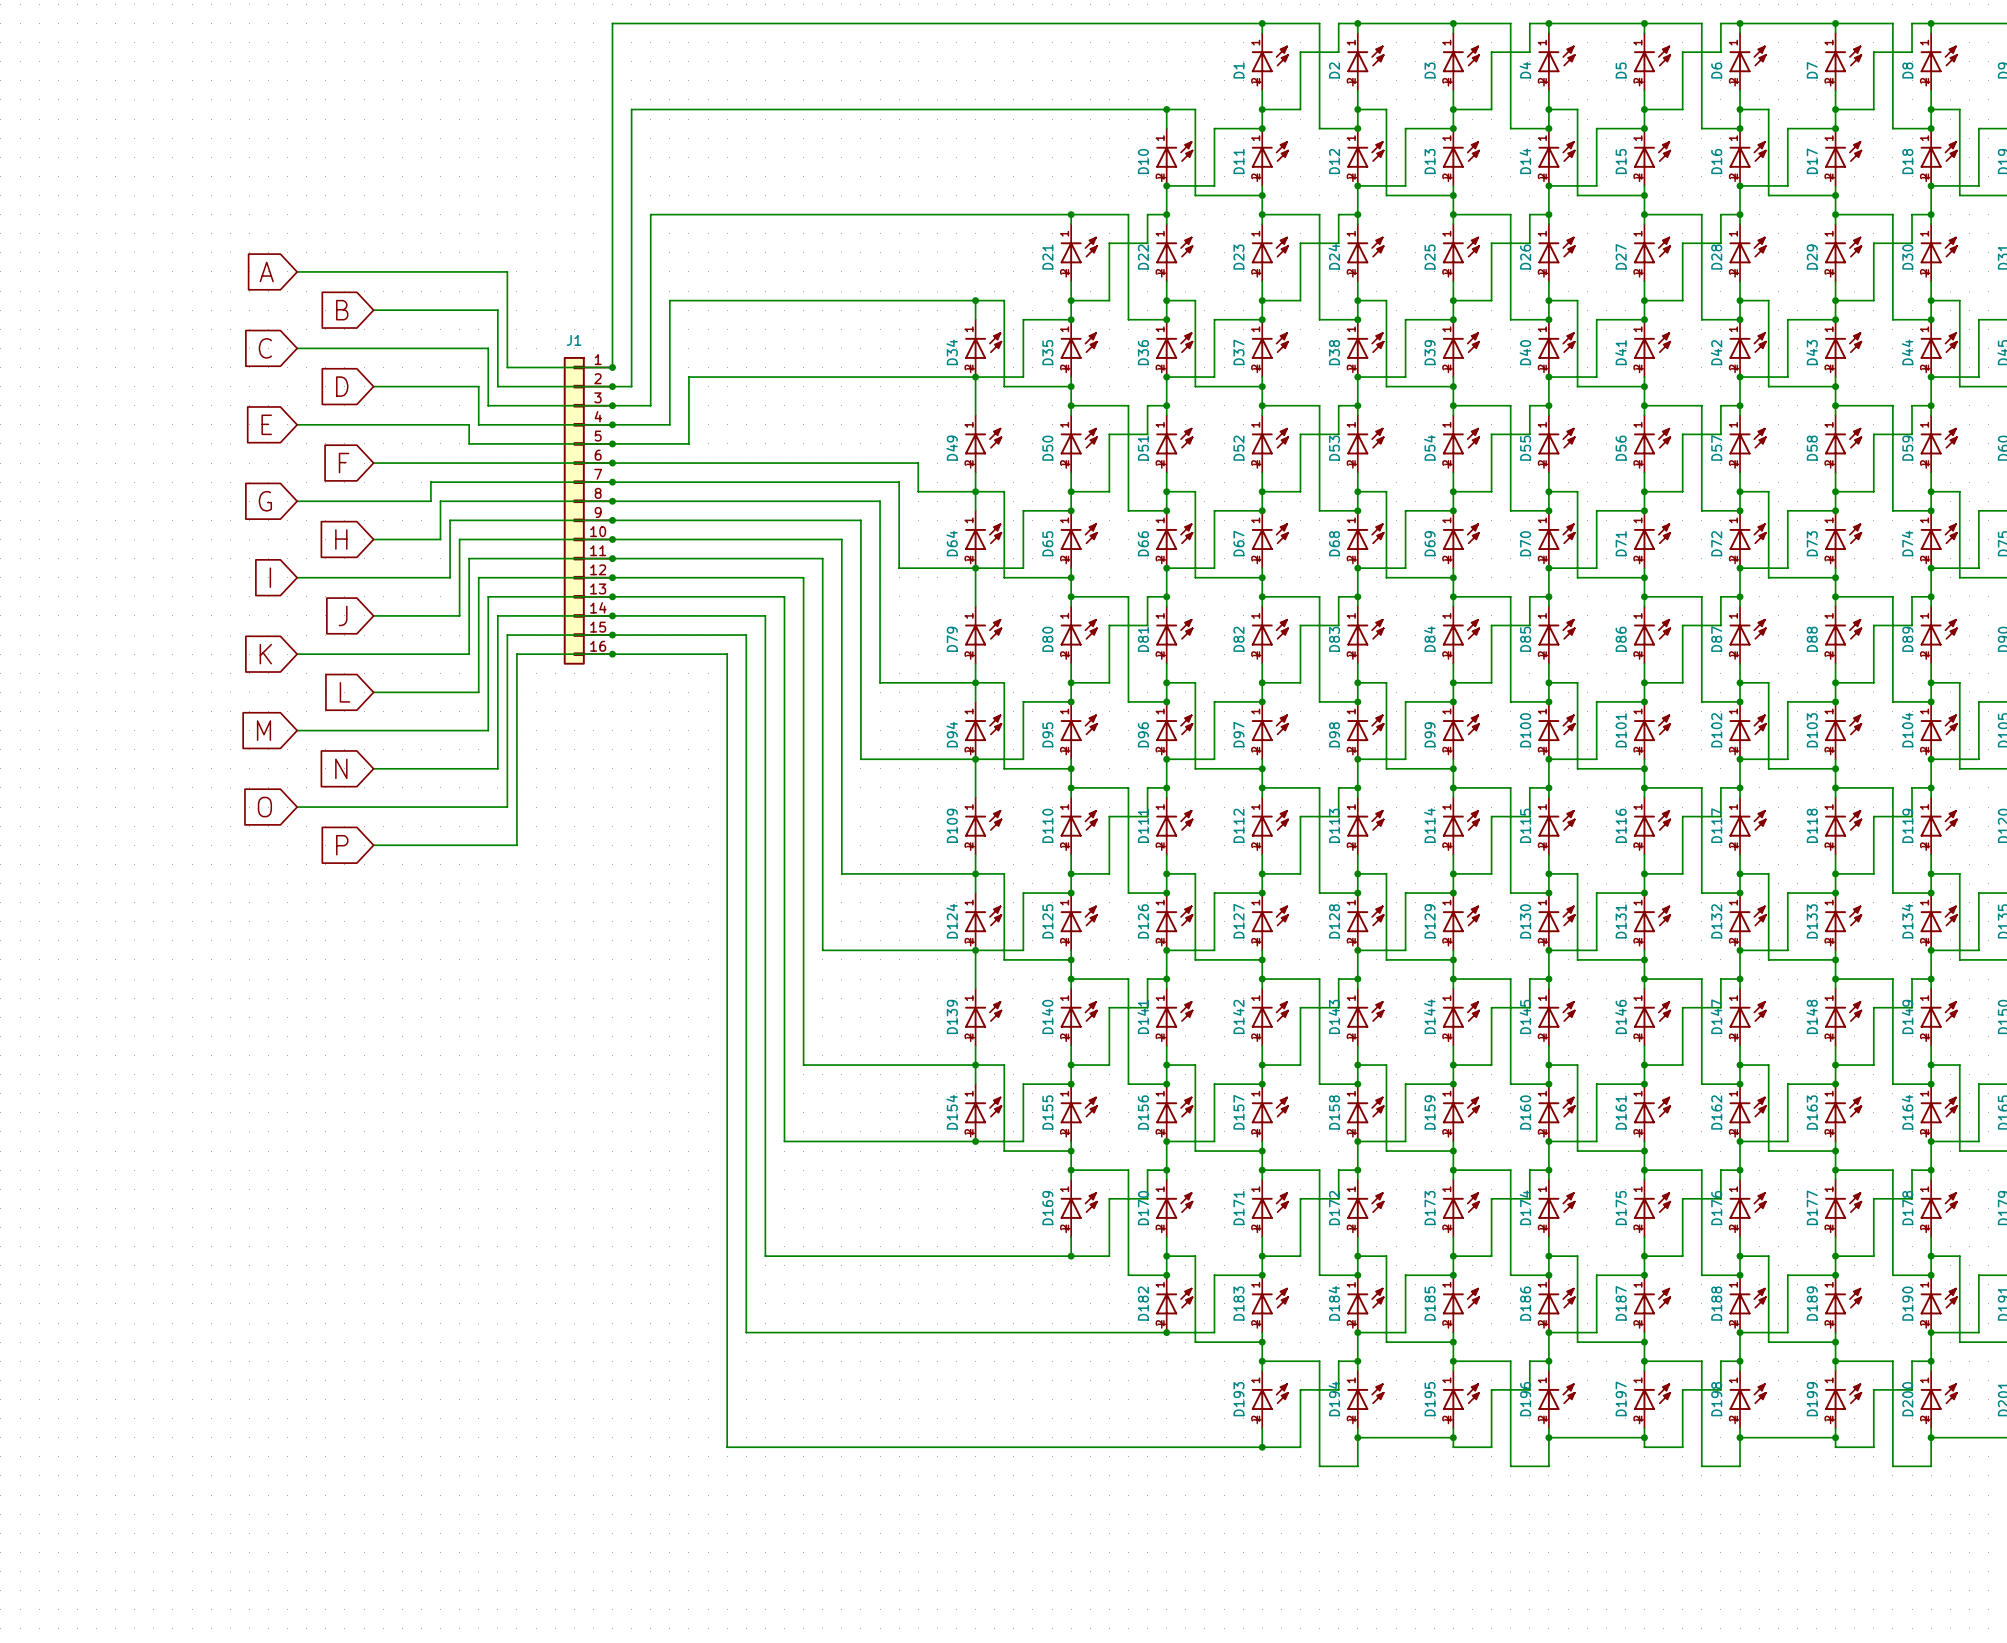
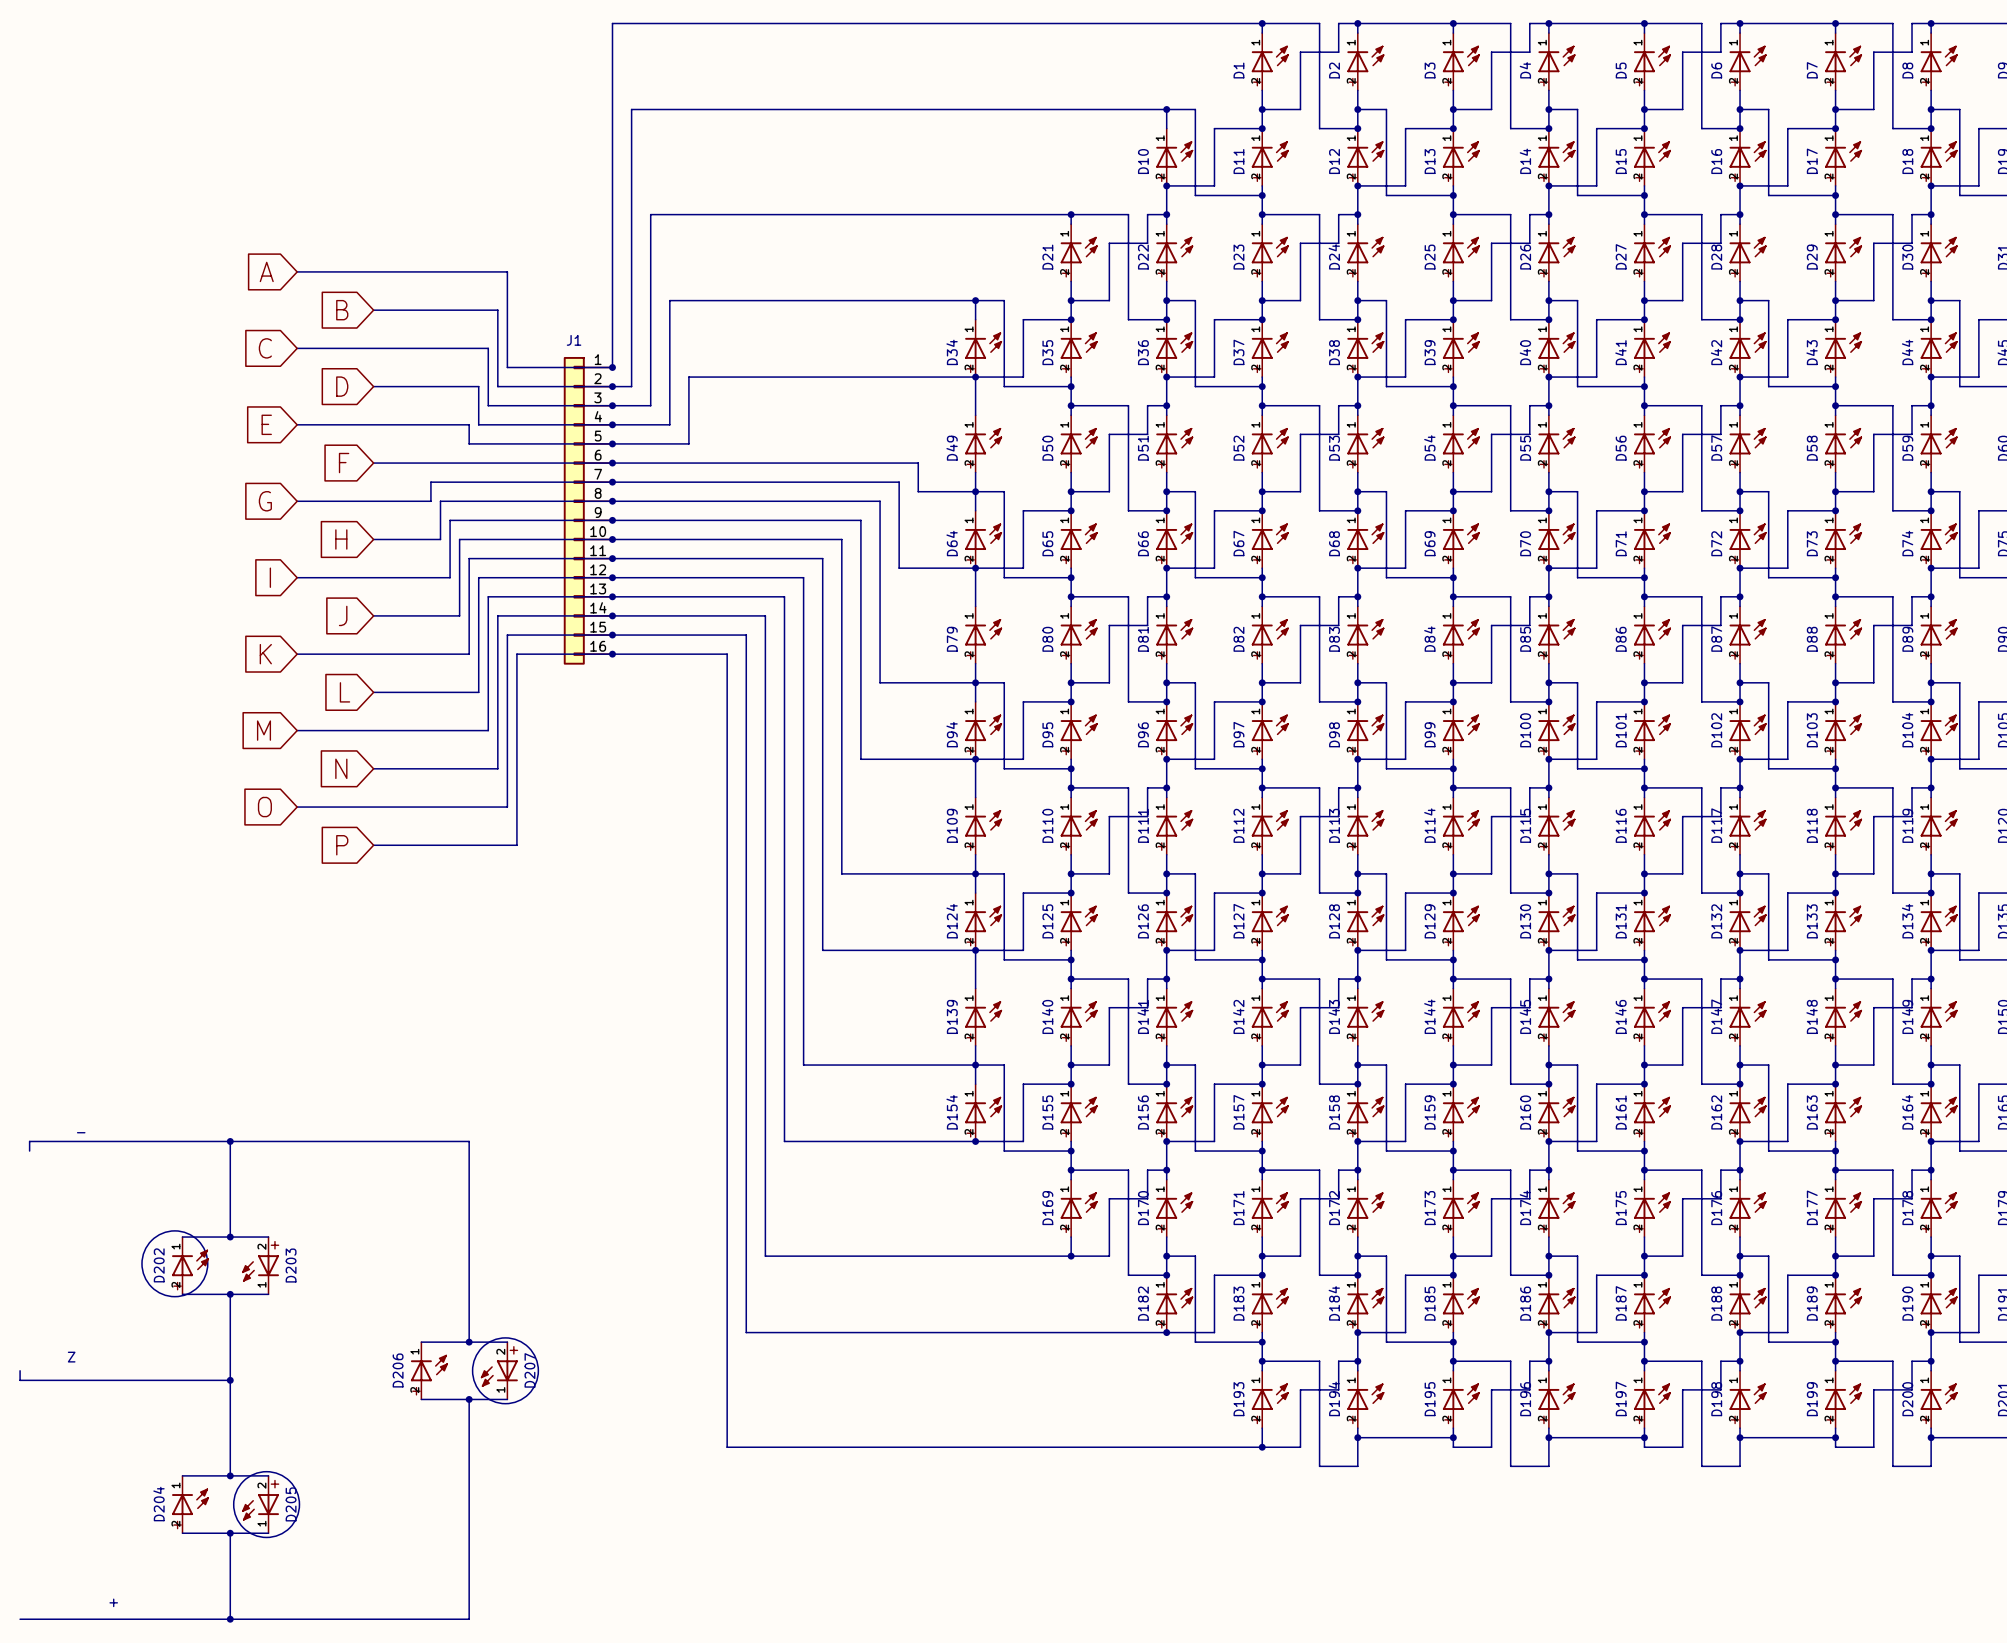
text: none -> - (81, 1132)
wire: none -> (230, 1141) (230, 1237)
junction: none -> (230, 1141)
wire: none -> (29, 1151) (29, 1141) (469, 1141) (469, 1342)
drawing: none -> [141, 1230, 208, 1297]
wire: none -> (182, 1237) (268, 1237)
junction: none -> (230, 1237)
D202: none -> (190, 1265)
D203: none -> (260, 1265)
wire: none -> (182, 1294) (268, 1294)
wire: none -> (230, 1294) (230, 1475)
junction: none -> (230, 1294)
drawing: none -> [472, 1337, 539, 1404]
wire: none -> (421, 1342) (507, 1342)
junction: none -> (469, 1342)
text: none -> Z (71, 1357)
wire: none -> (20, 1370) (20, 1380) (230, 1380)
D206: none -> (429, 1370)
D207: none -> (499, 1370)
junction: none -> (230, 1380)
wire: none -> (421, 1399) (507, 1399)
wire: none -> (469, 1399) (469, 1619) (20, 1619)
junction: none -> (469, 1399)
drawing: none -> [233, 1471, 300, 1538]
wire: none -> (182, 1475) (268, 1475)
junction: none -> (230, 1475)
D204: none -> (190, 1504)
D205: none -> (260, 1504)
wire: none -> (182, 1533) (268, 1533)
wire: none -> (230, 1533) (230, 1619)
junction: none -> (230, 1533)
text: none -> + (113, 1602)
junction: none -> (230, 1619)

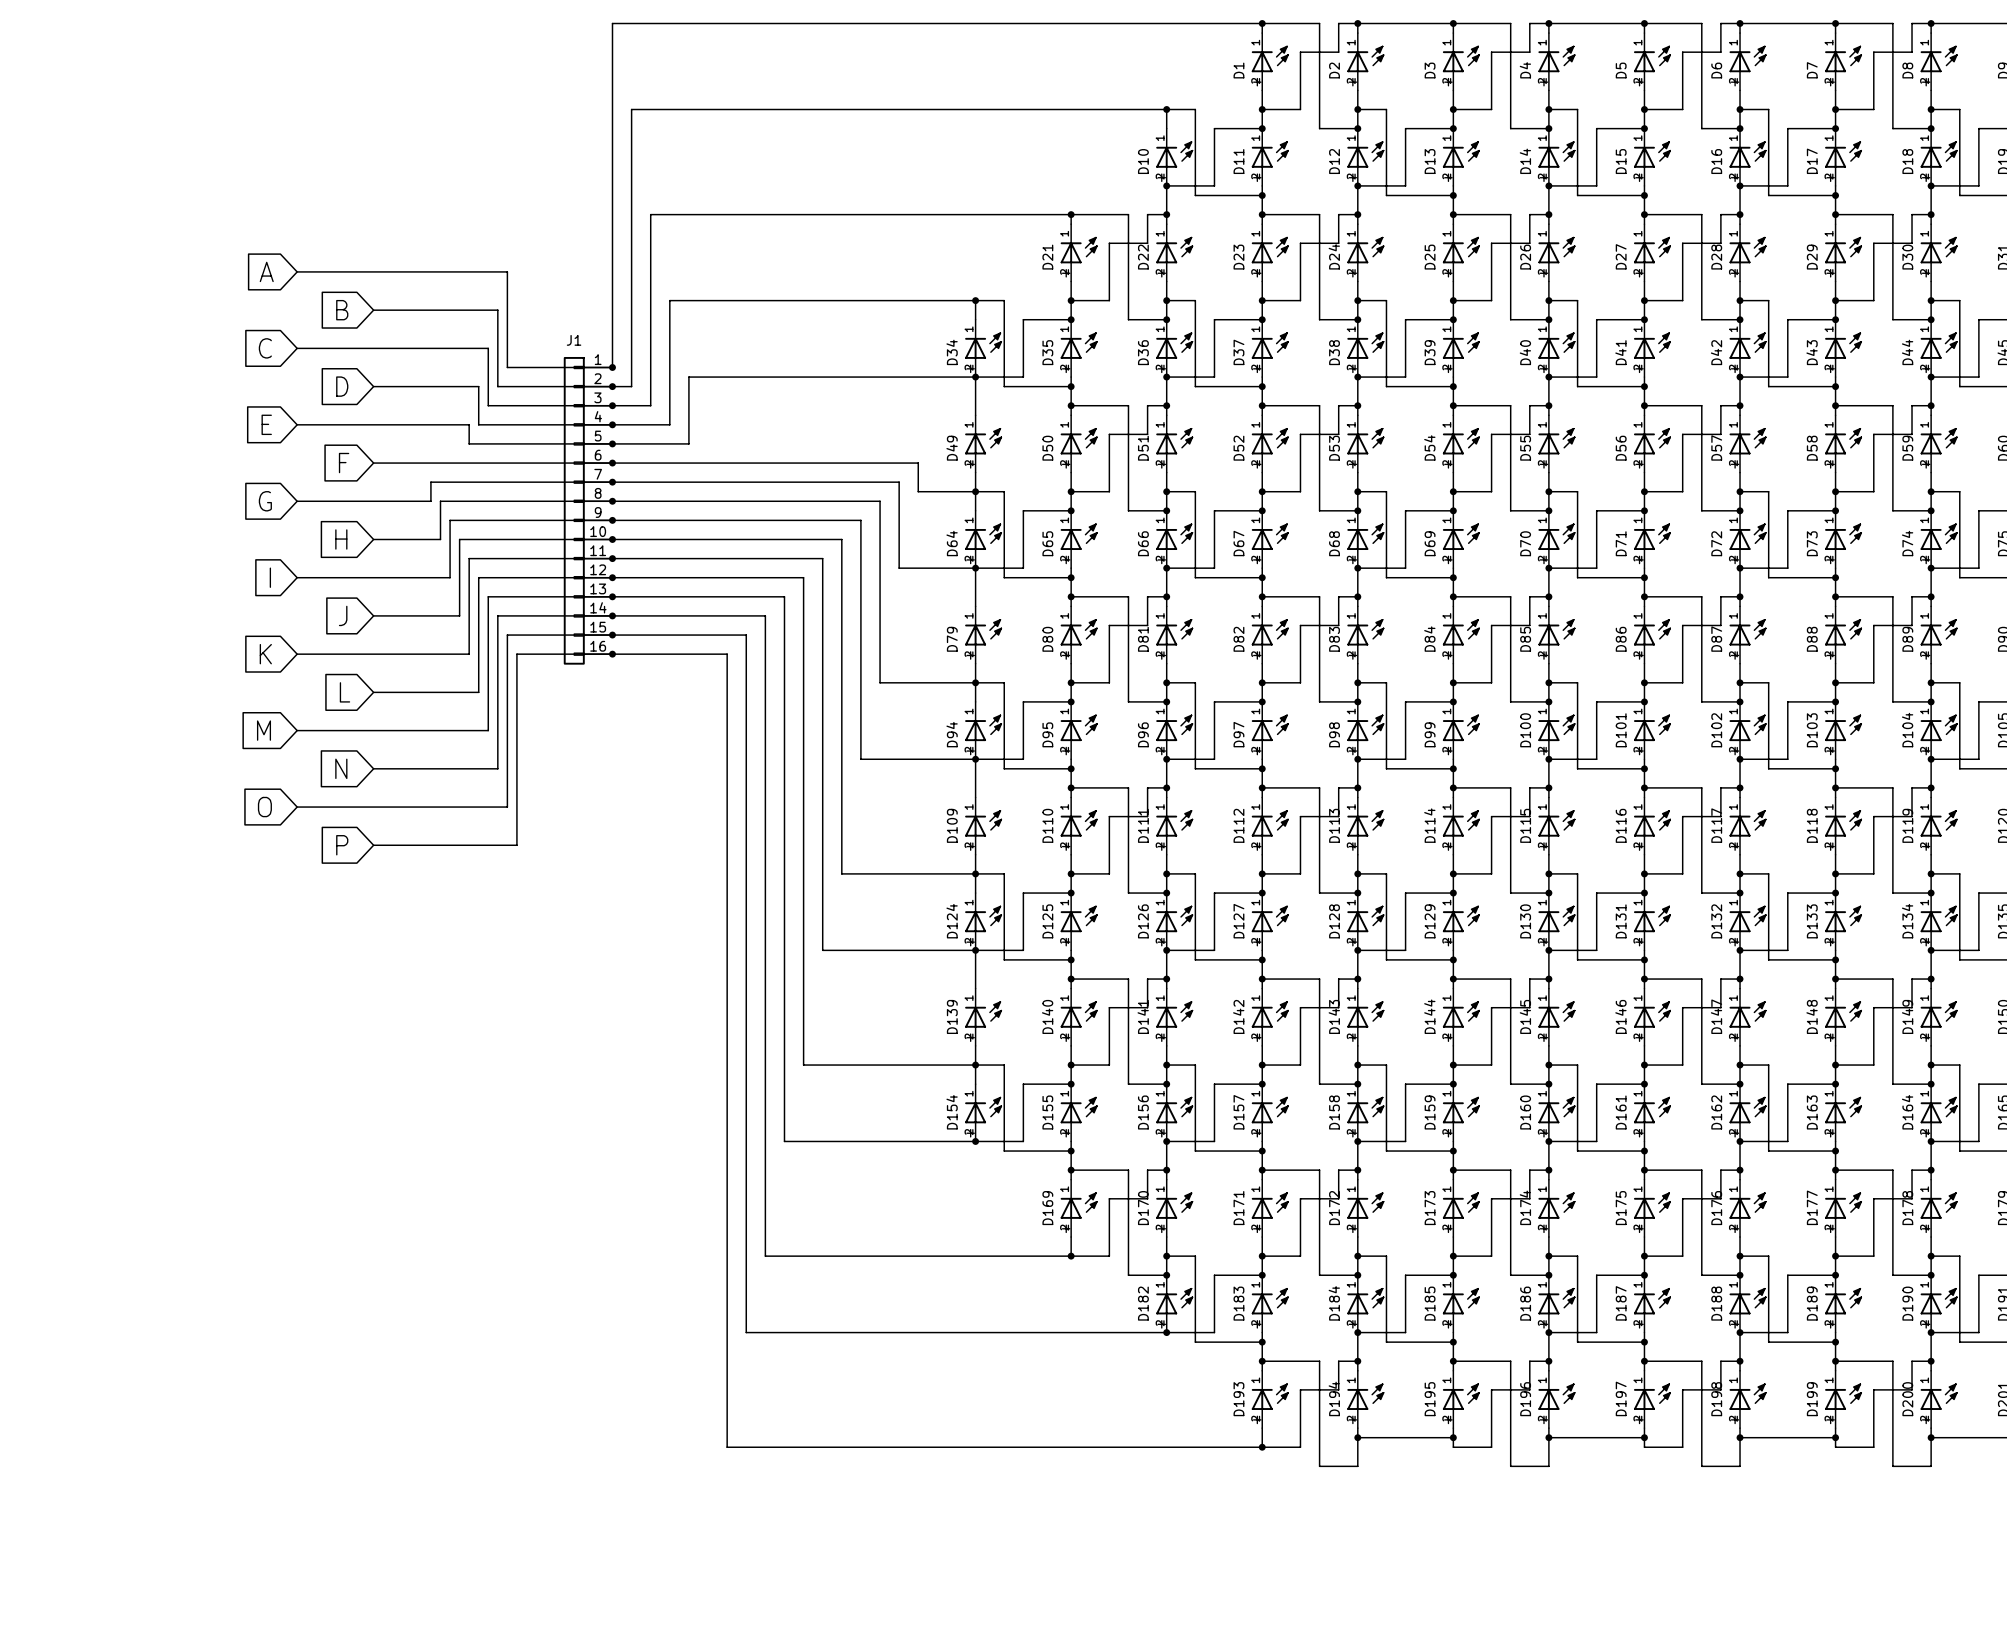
text: - (81, 1132) -> none
wire: (230, 1141) (230, 1237) -> none
junction: (230, 1141) -> none
wire: (29, 1151) (29, 1141) (469, 1141) (469, 1342) -> none
drawing: [141, 1230, 208, 1297] -> none
wire: (182, 1237) (268, 1237) -> none
junction: (230, 1237) -> none
D202: (190, 1265) -> none
D203: (260, 1265) -> none
wire: (182, 1294) (268, 1294) -> none
wire: (230, 1294) (230, 1475) -> none
junction: (230, 1294) -> none
drawing: [472, 1337, 539, 1404] -> none
wire: (421, 1342) (507, 1342) -> none
junction: (469, 1342) -> none
text: Z (71, 1357) -> none
wire: (20, 1370) (20, 1380) (230, 1380) -> none
D206: (429, 1370) -> none
D207: (499, 1370) -> none
junction: (230, 1380) -> none
wire: (421, 1399) (507, 1399) -> none
wire: (469, 1399) (469, 1619) (20, 1619) -> none
junction: (469, 1399) -> none
drawing: [233, 1471, 300, 1538] -> none
wire: (182, 1475) (268, 1475) -> none
junction: (230, 1475) -> none
D204: (190, 1504) -> none
D205: (260, 1504) -> none
wire: (182, 1533) (268, 1533) -> none
wire: (230, 1533) (230, 1619) -> none
junction: (230, 1533) -> none
text: + (113, 1602) -> none
junction: (230, 1619) -> none

